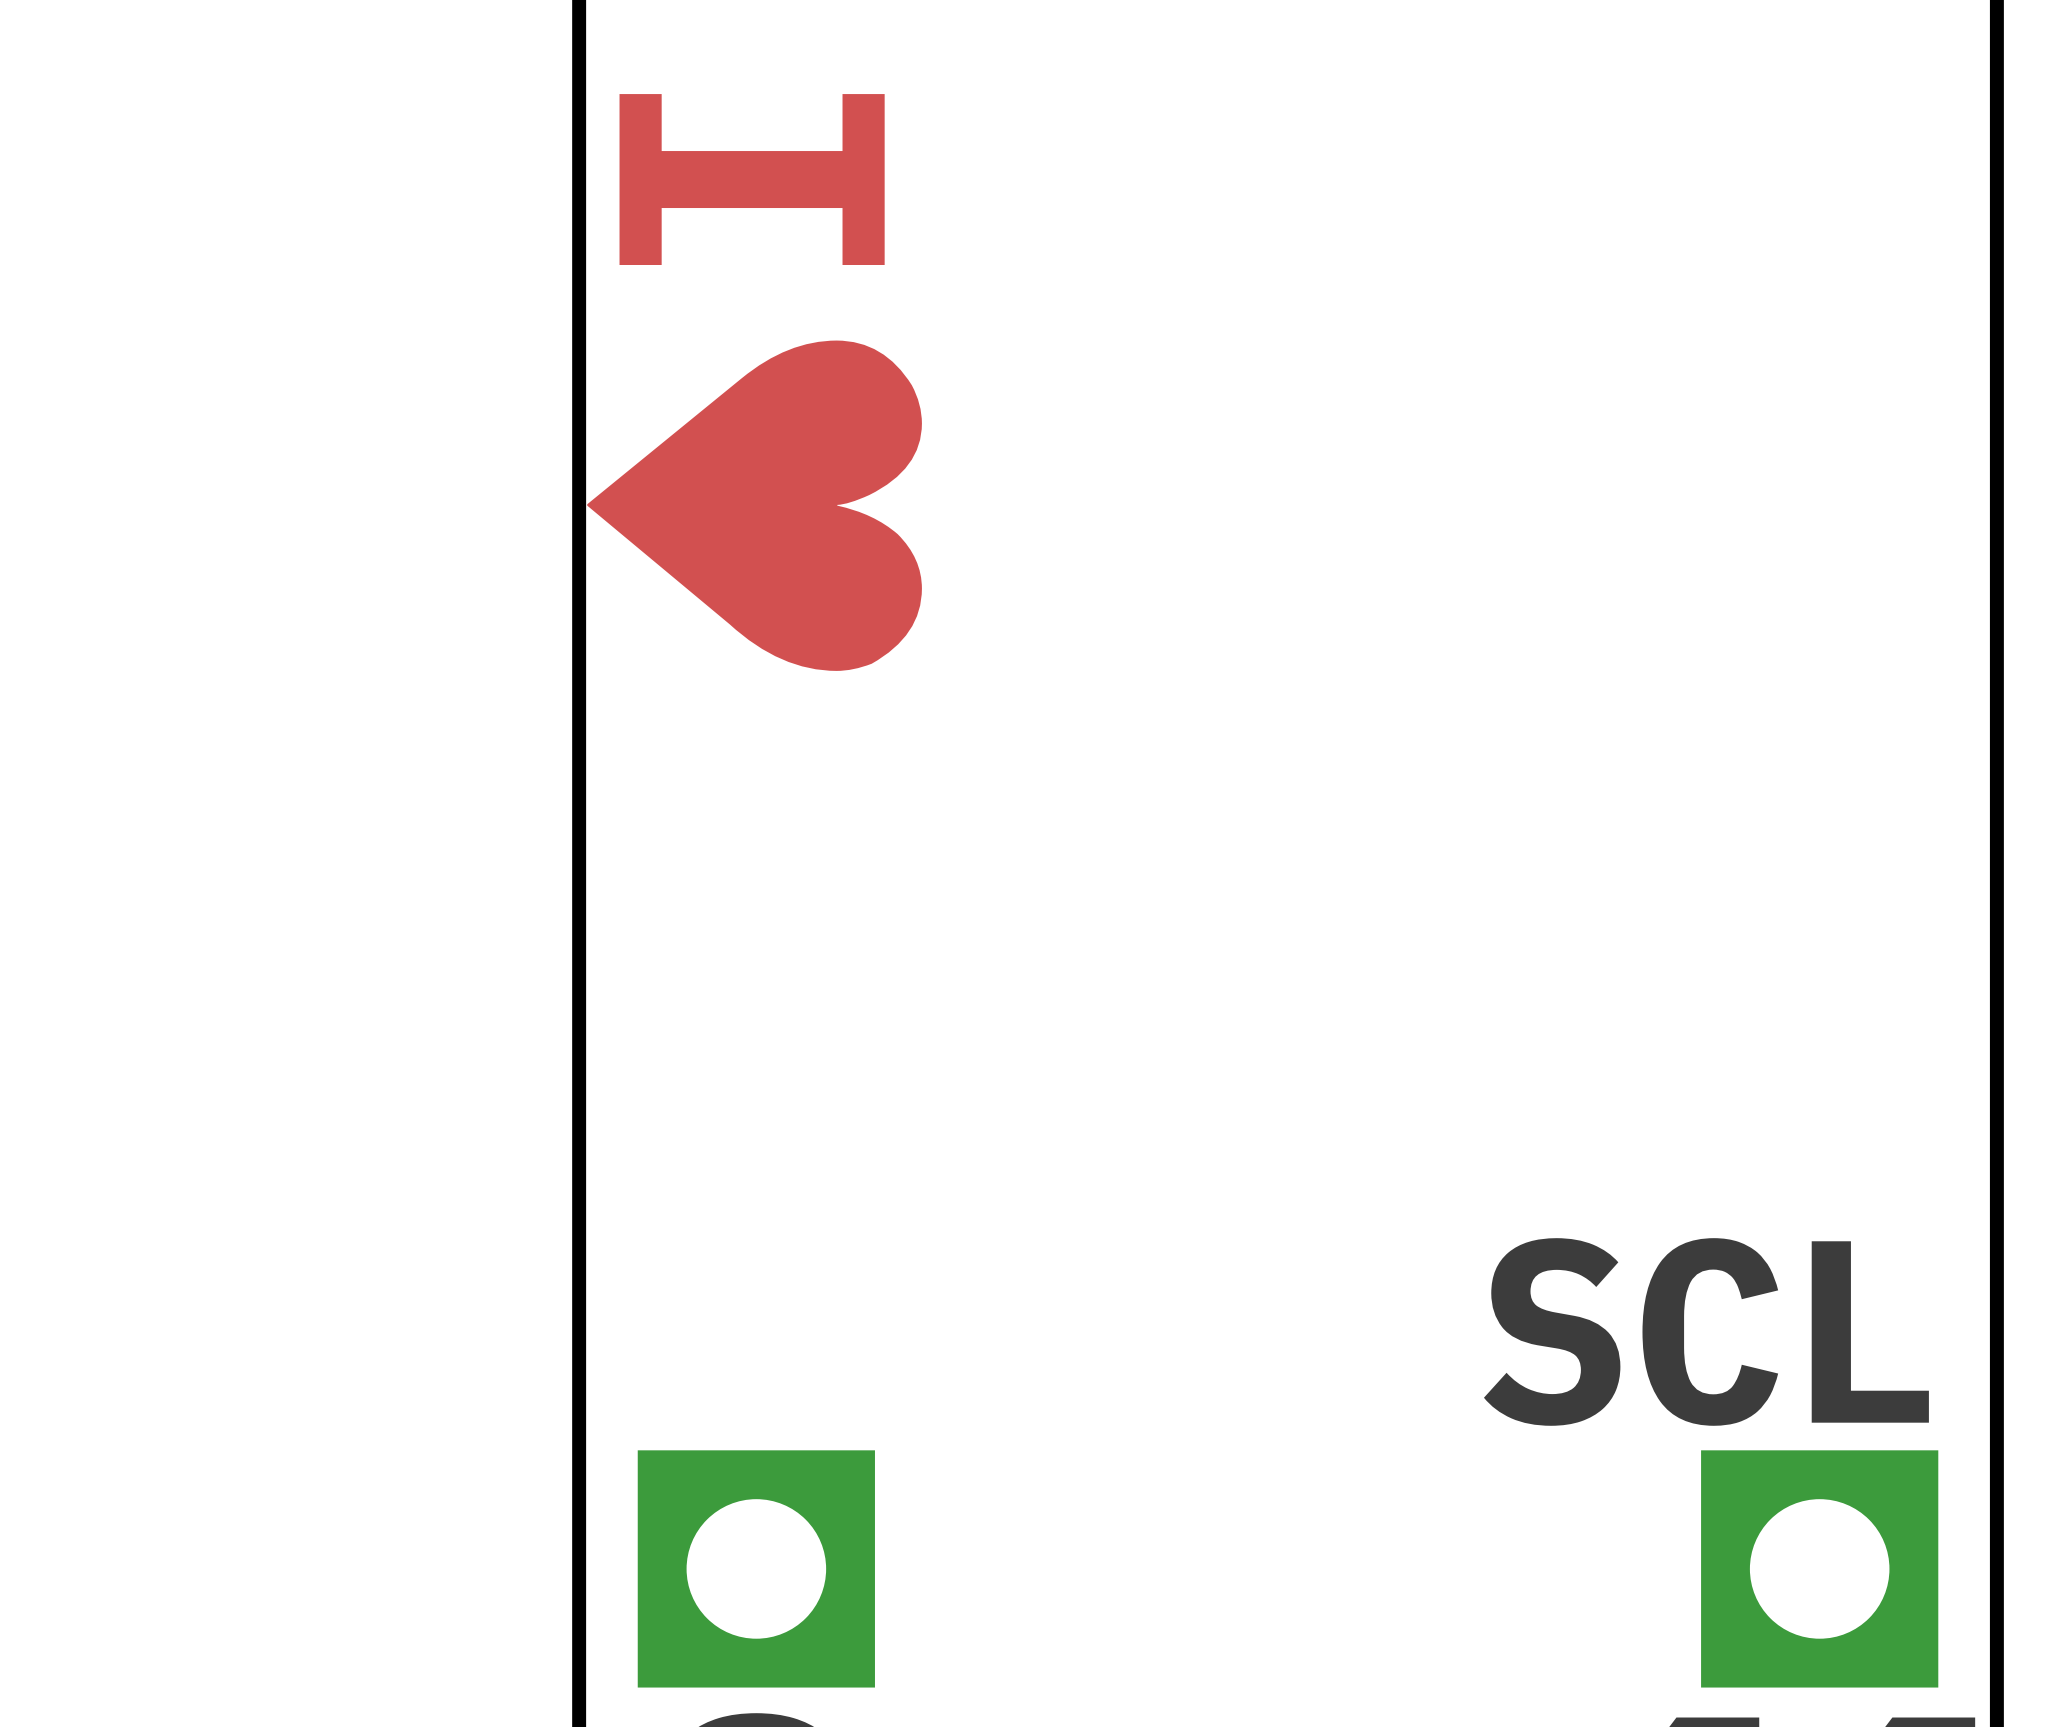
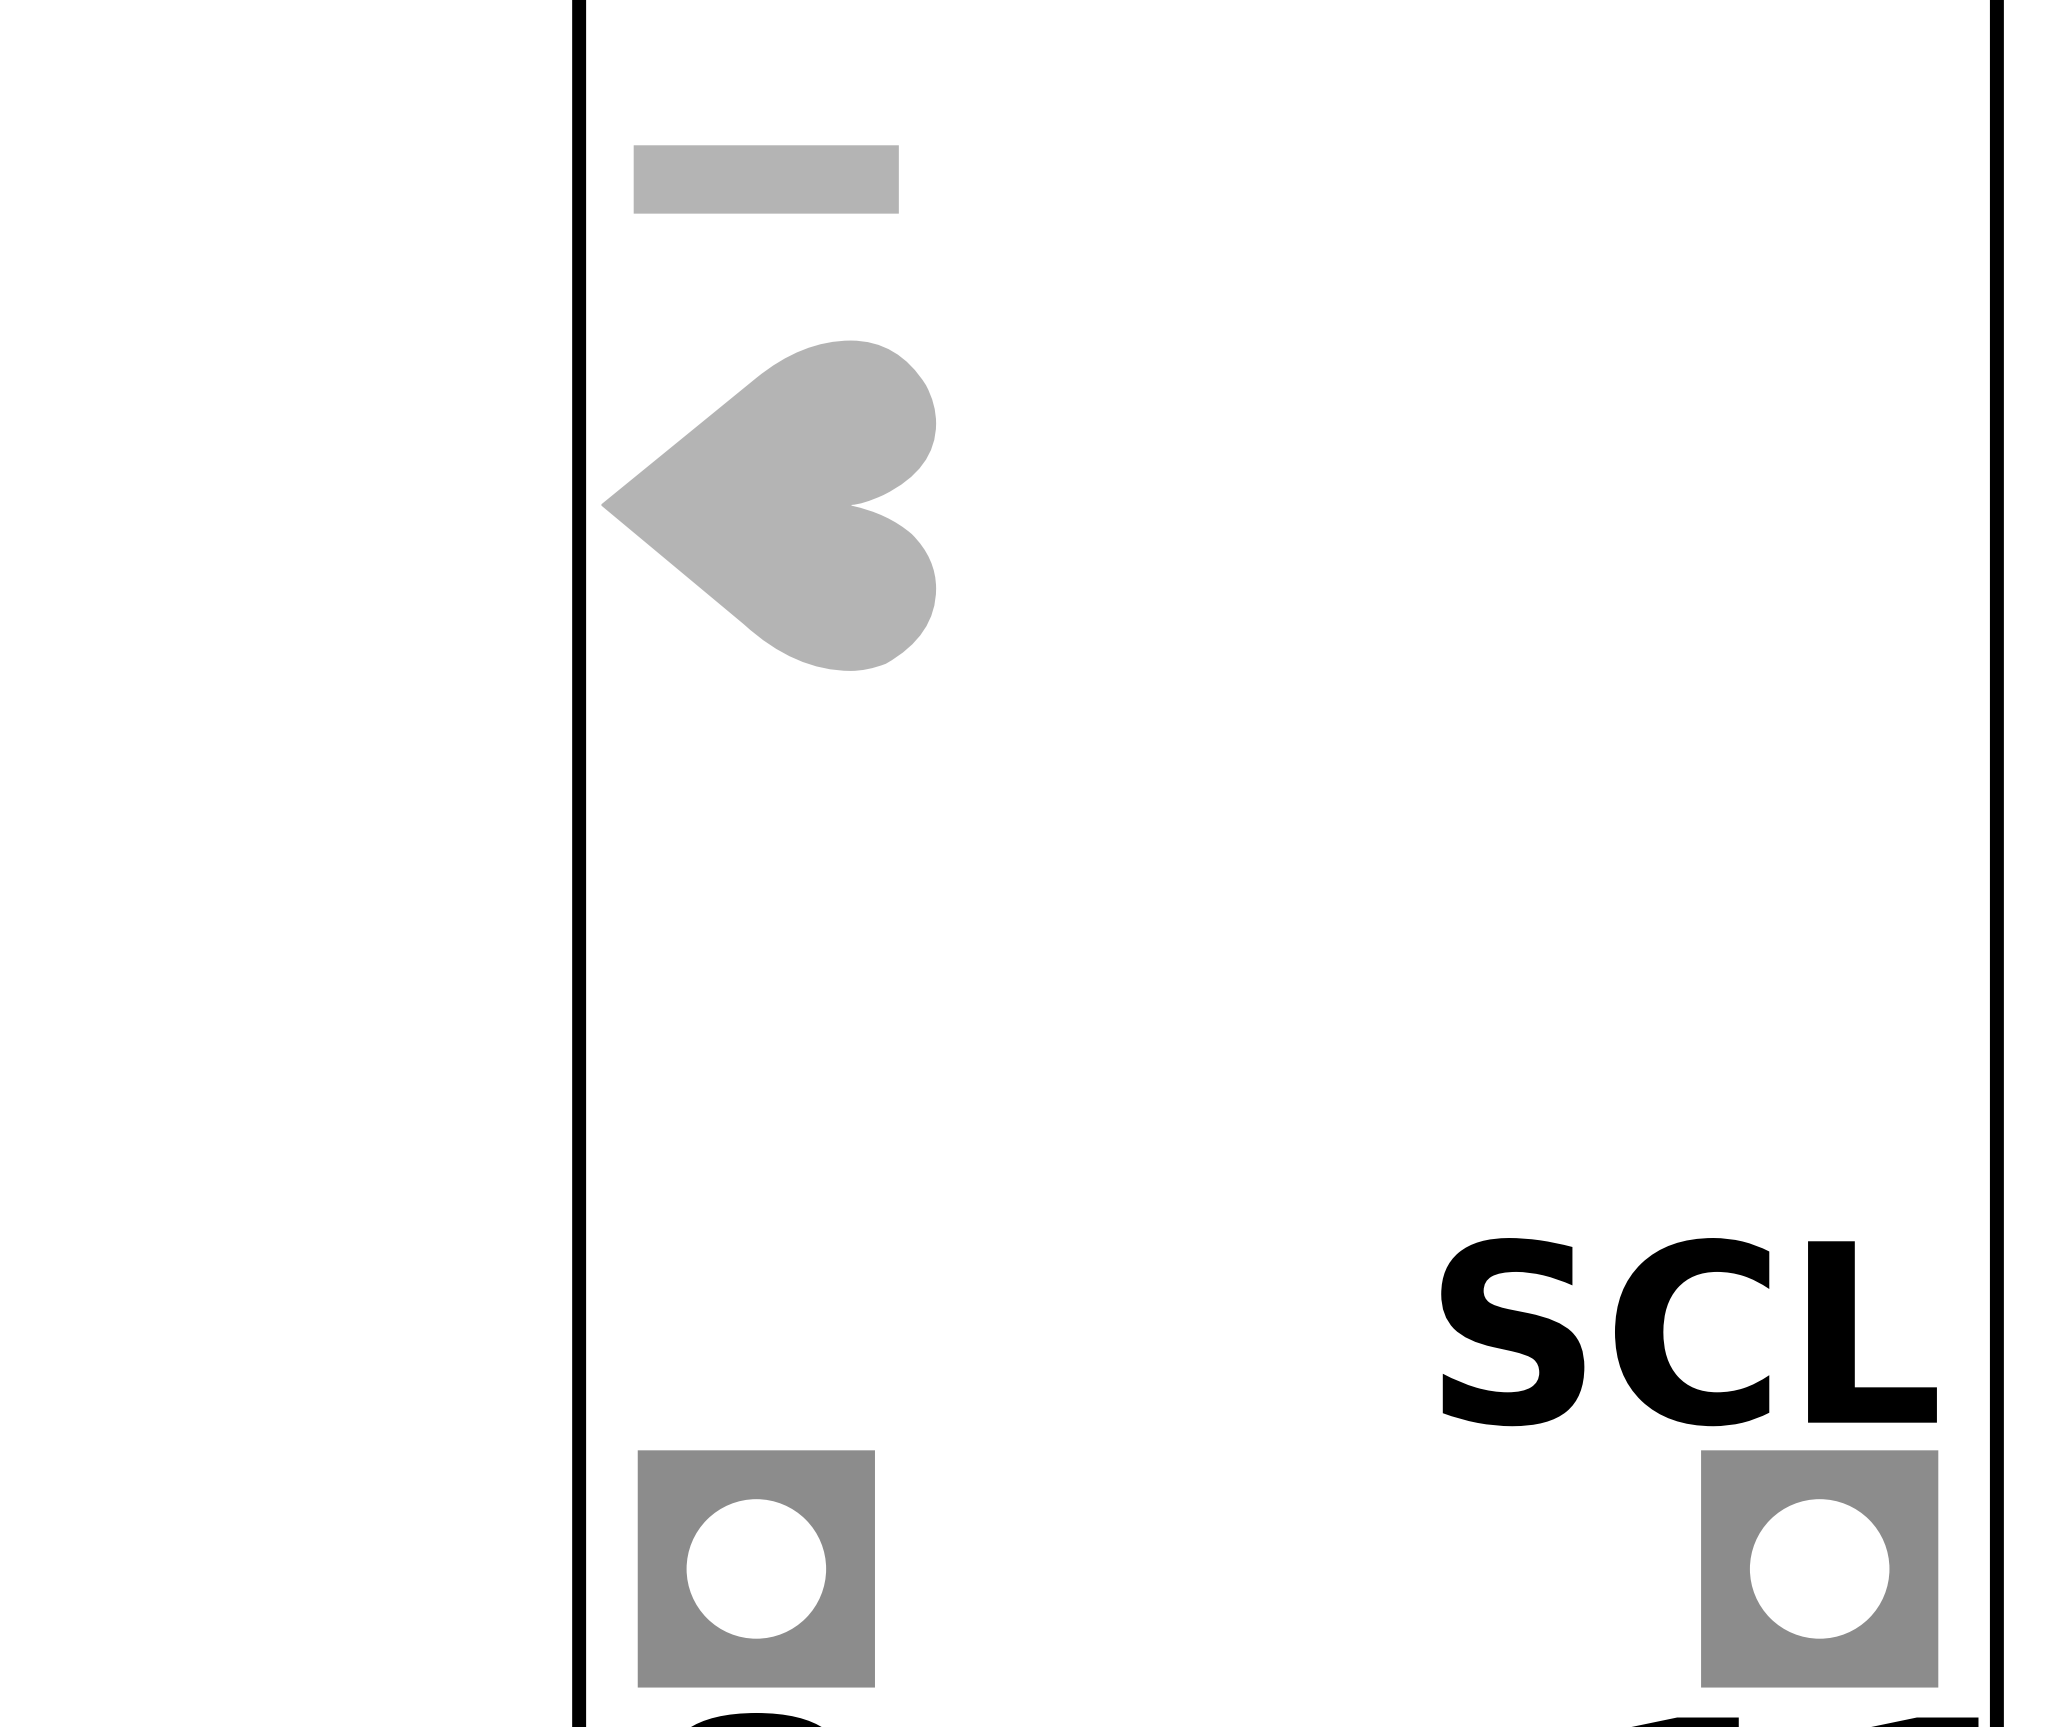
text position: I (752, 179) -> I (766, 179)
text position: ♥ (754, 505) -> ♥ (768, 505)

